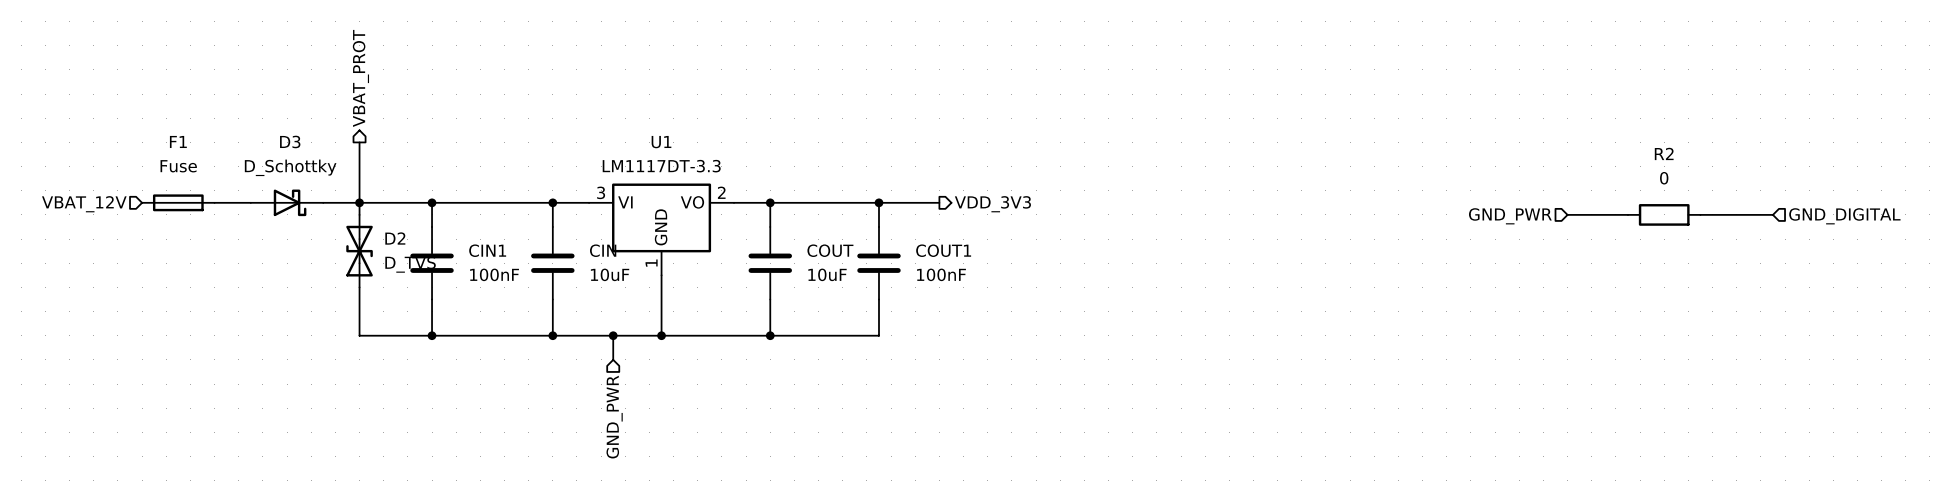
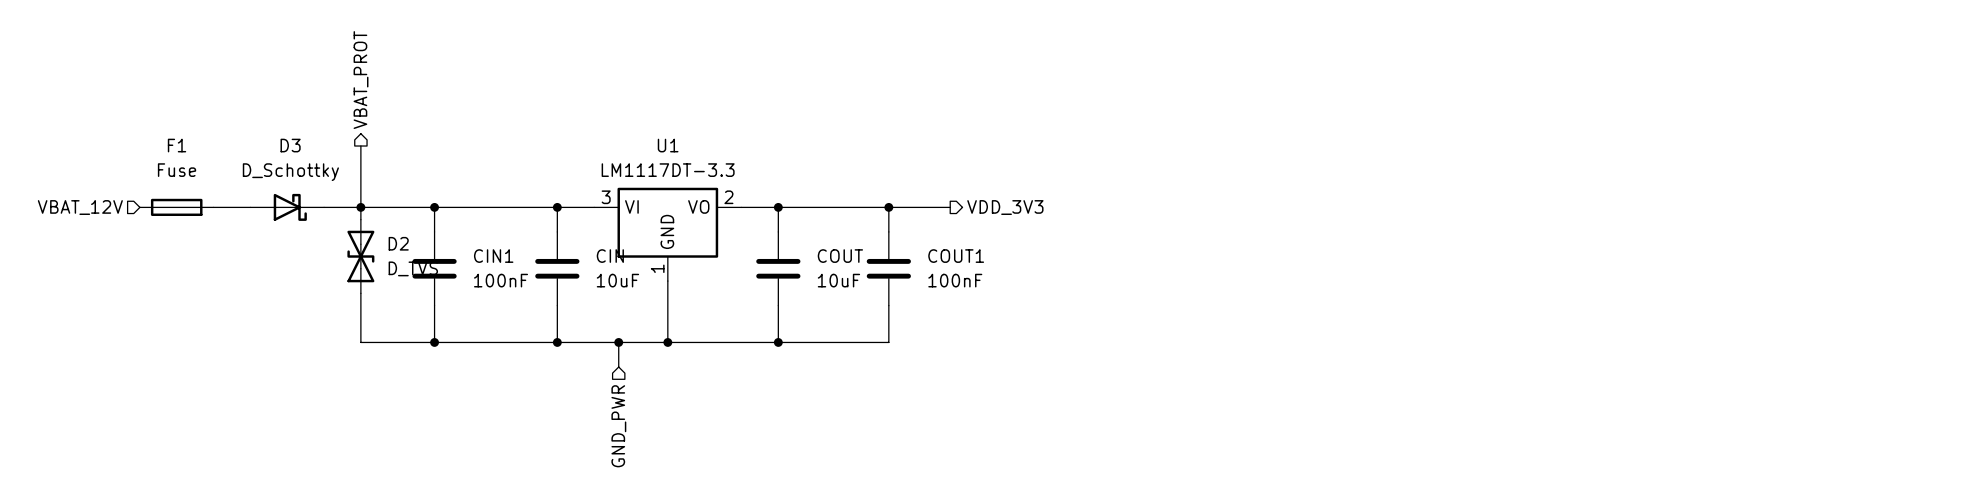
wire: (1567, 214) (1627, 214) -> none
R2: 0 (1664, 214) -> none
wire: (1700, 214) (1772, 214) -> none
hierarchical label: GND_PWR (1510, 216) -> none
hierarchical label: GND_DIGITAL (1844, 216) -> none

